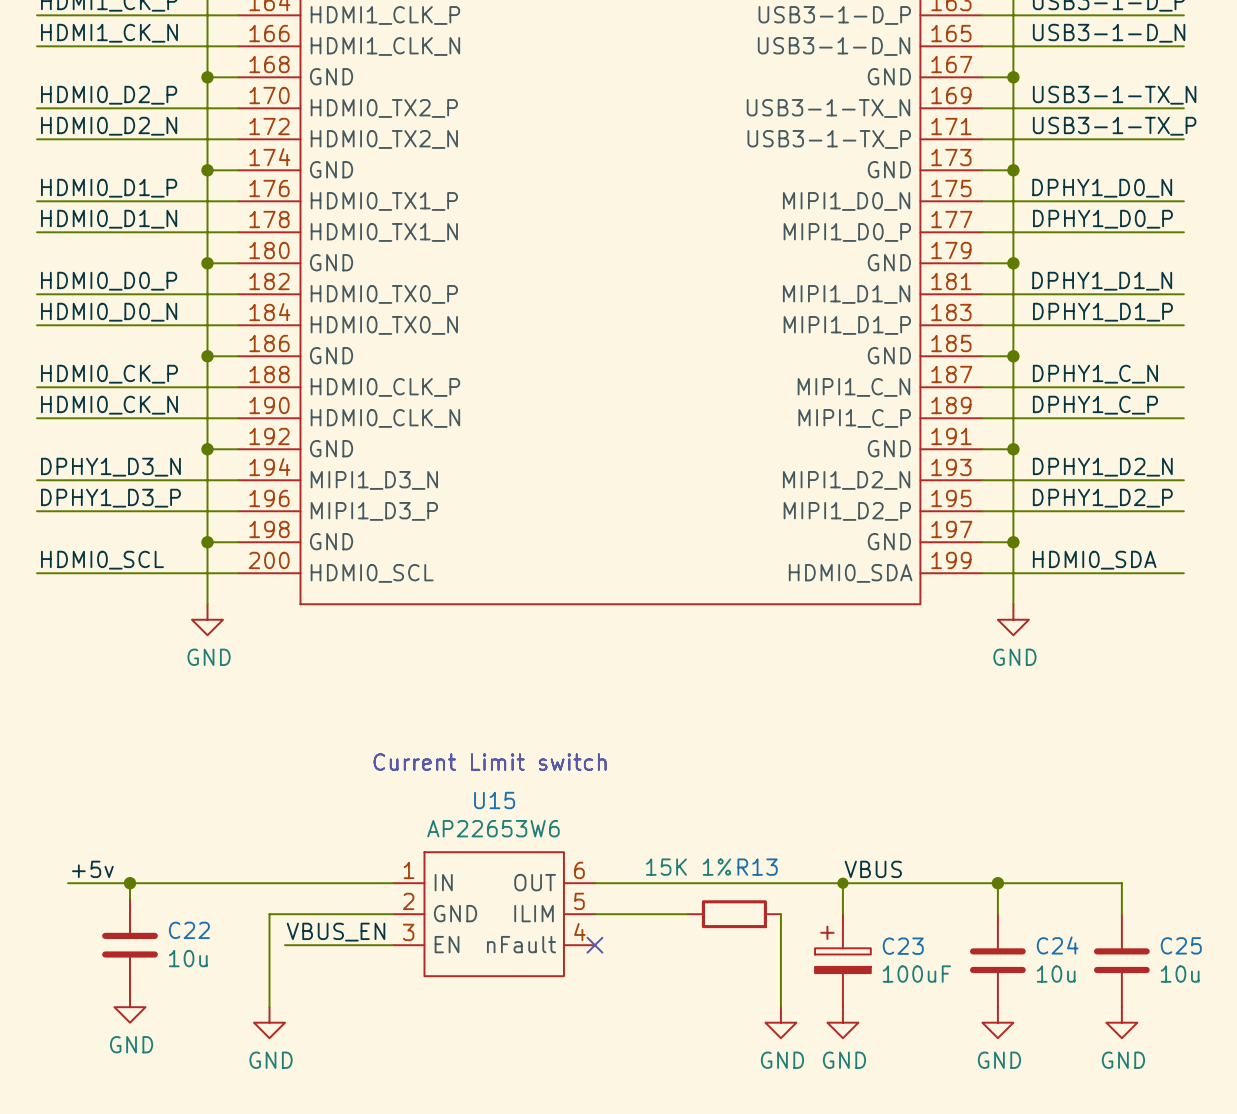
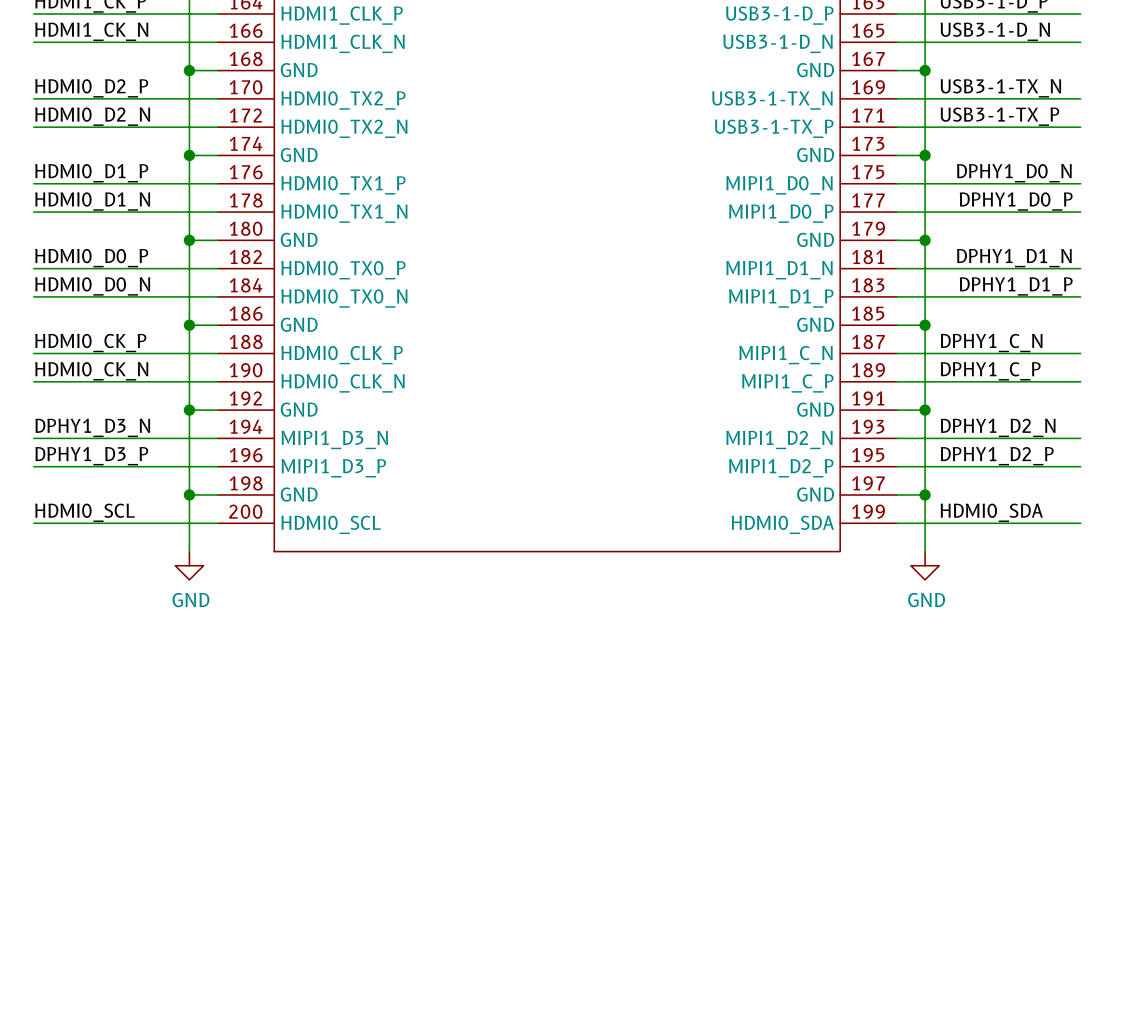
text: Current Limit switch (490, 762) -> none
label: +5v (92, 869) -> none
label: VBUS (873, 869) -> none
wire: (68, 883) (393, 883) -> none
wire: (130, 883) (130, 898) -> none
junction: (130, 883) -> none
wire: (594, 883) (1121, 883) (1121, 914) -> none
wire: (842, 883) (842, 914) -> none
junction: (842, 883) -> none
wire: (997, 883) (997, 914) -> none
junction: (997, 883) -> none
wire: (393, 914) (269, 914) (269, 1007) -> none
U15: AP22653W6 (494, 914) -> none
wire: (594, 914) (687, 914) -> none
R13: 15K 1% (734, 914) -> none
wire: (780, 914) (780, 1007) -> none
label: VBUS_EN (336, 932) -> none
C22: 10u (130, 945) -> none
wire: (284, 945) (393, 945) -> none
no-connect mark: (594, 945) -> none
C23: 100uF (842, 960) -> none
C24: 10u (997, 960) -> none
C25: 10u (1121, 960) -> none
power symbol: GND (130, 1007) -> none
power symbol: GND (269, 1022) -> none
power symbol: GND (780, 1022) -> none
power symbol: GND (842, 1022) -> none
power symbol: GND (997, 1022) -> none
power symbol: GND (1121, 1022) -> none

